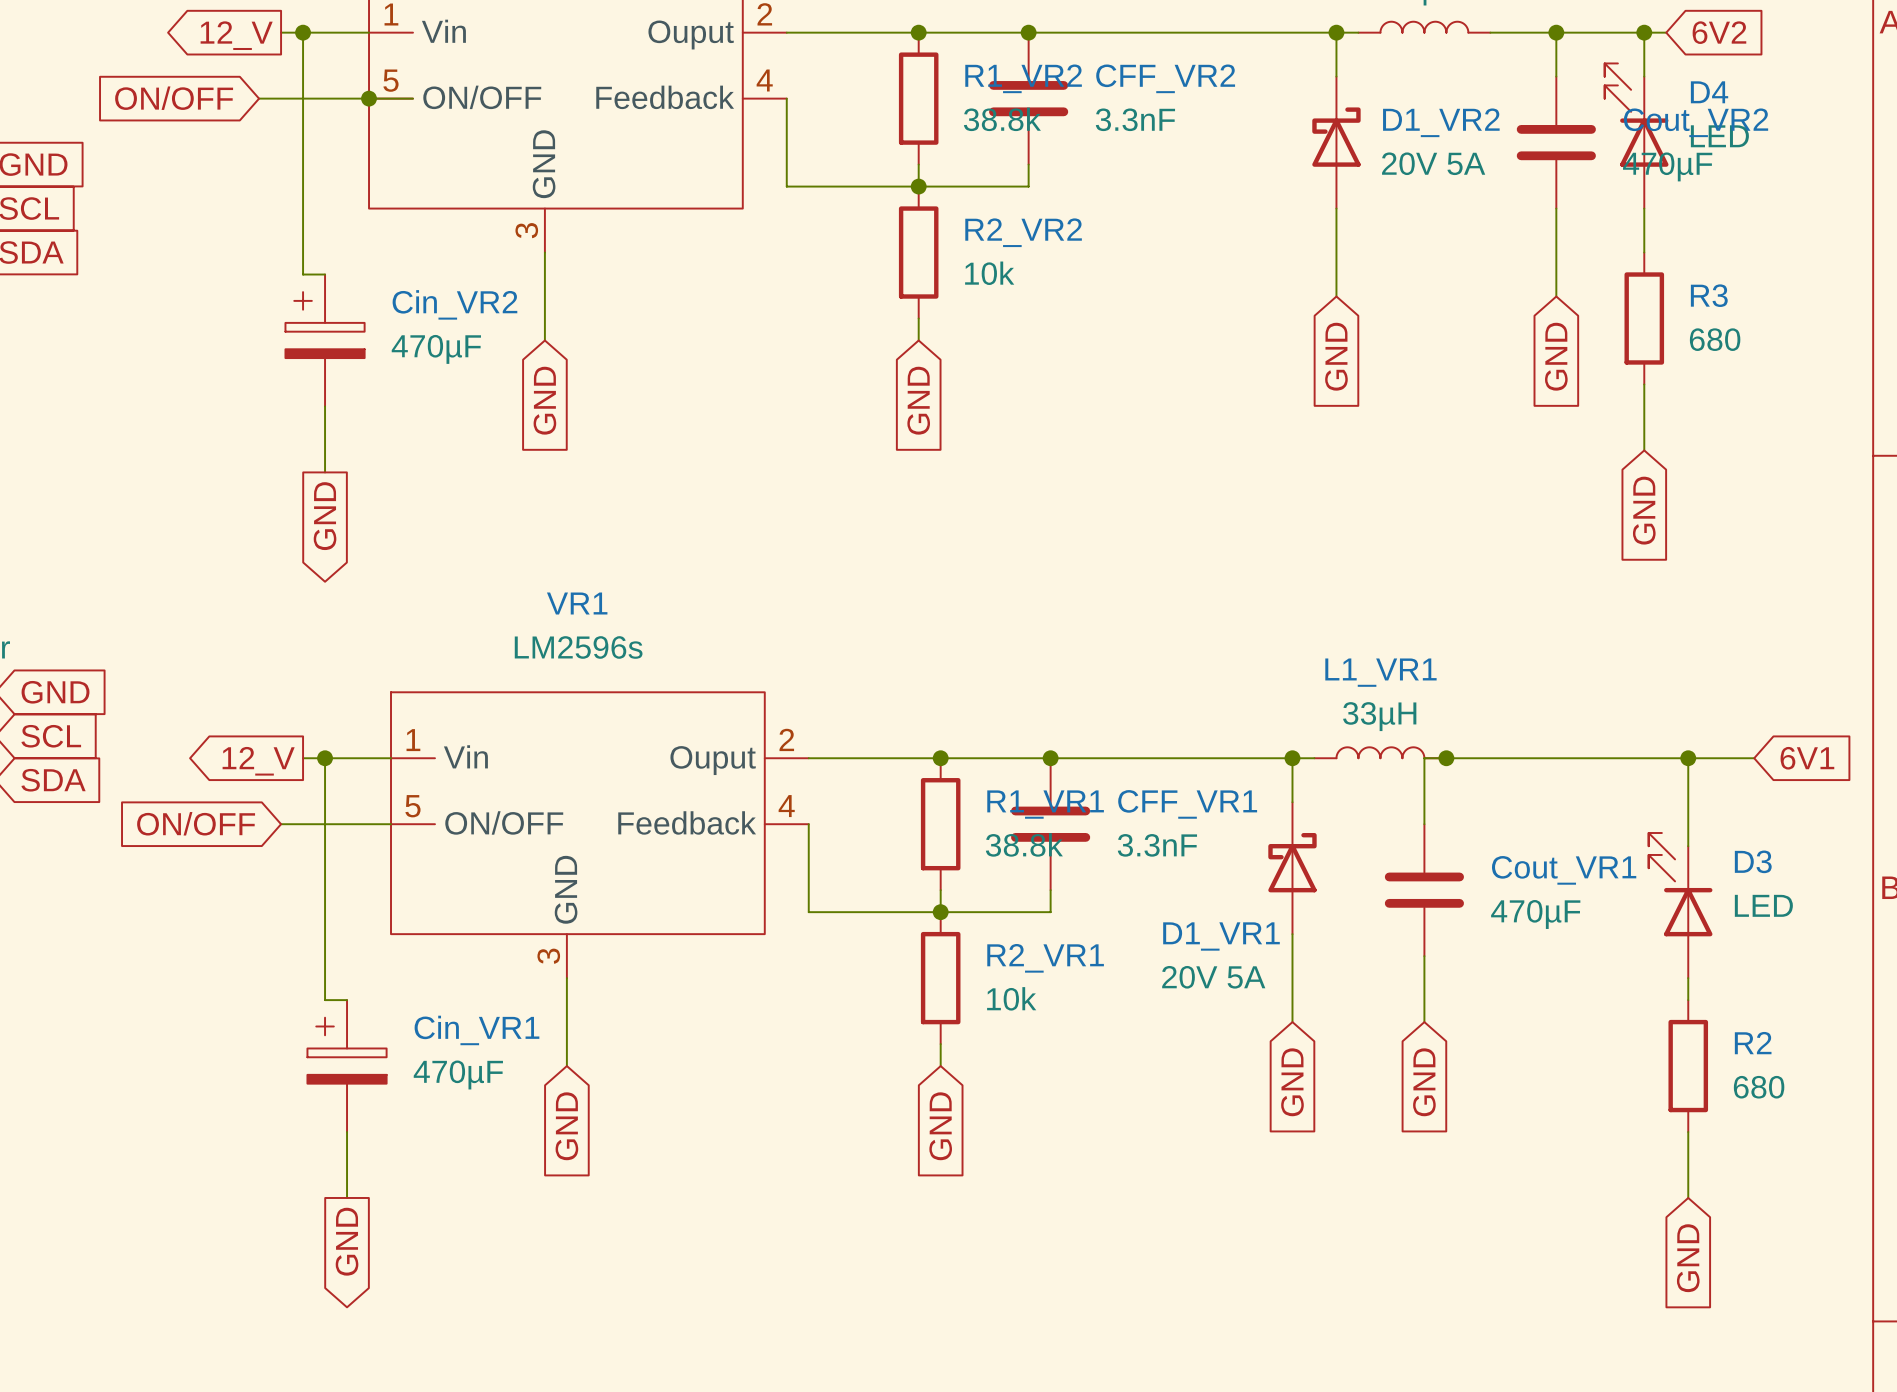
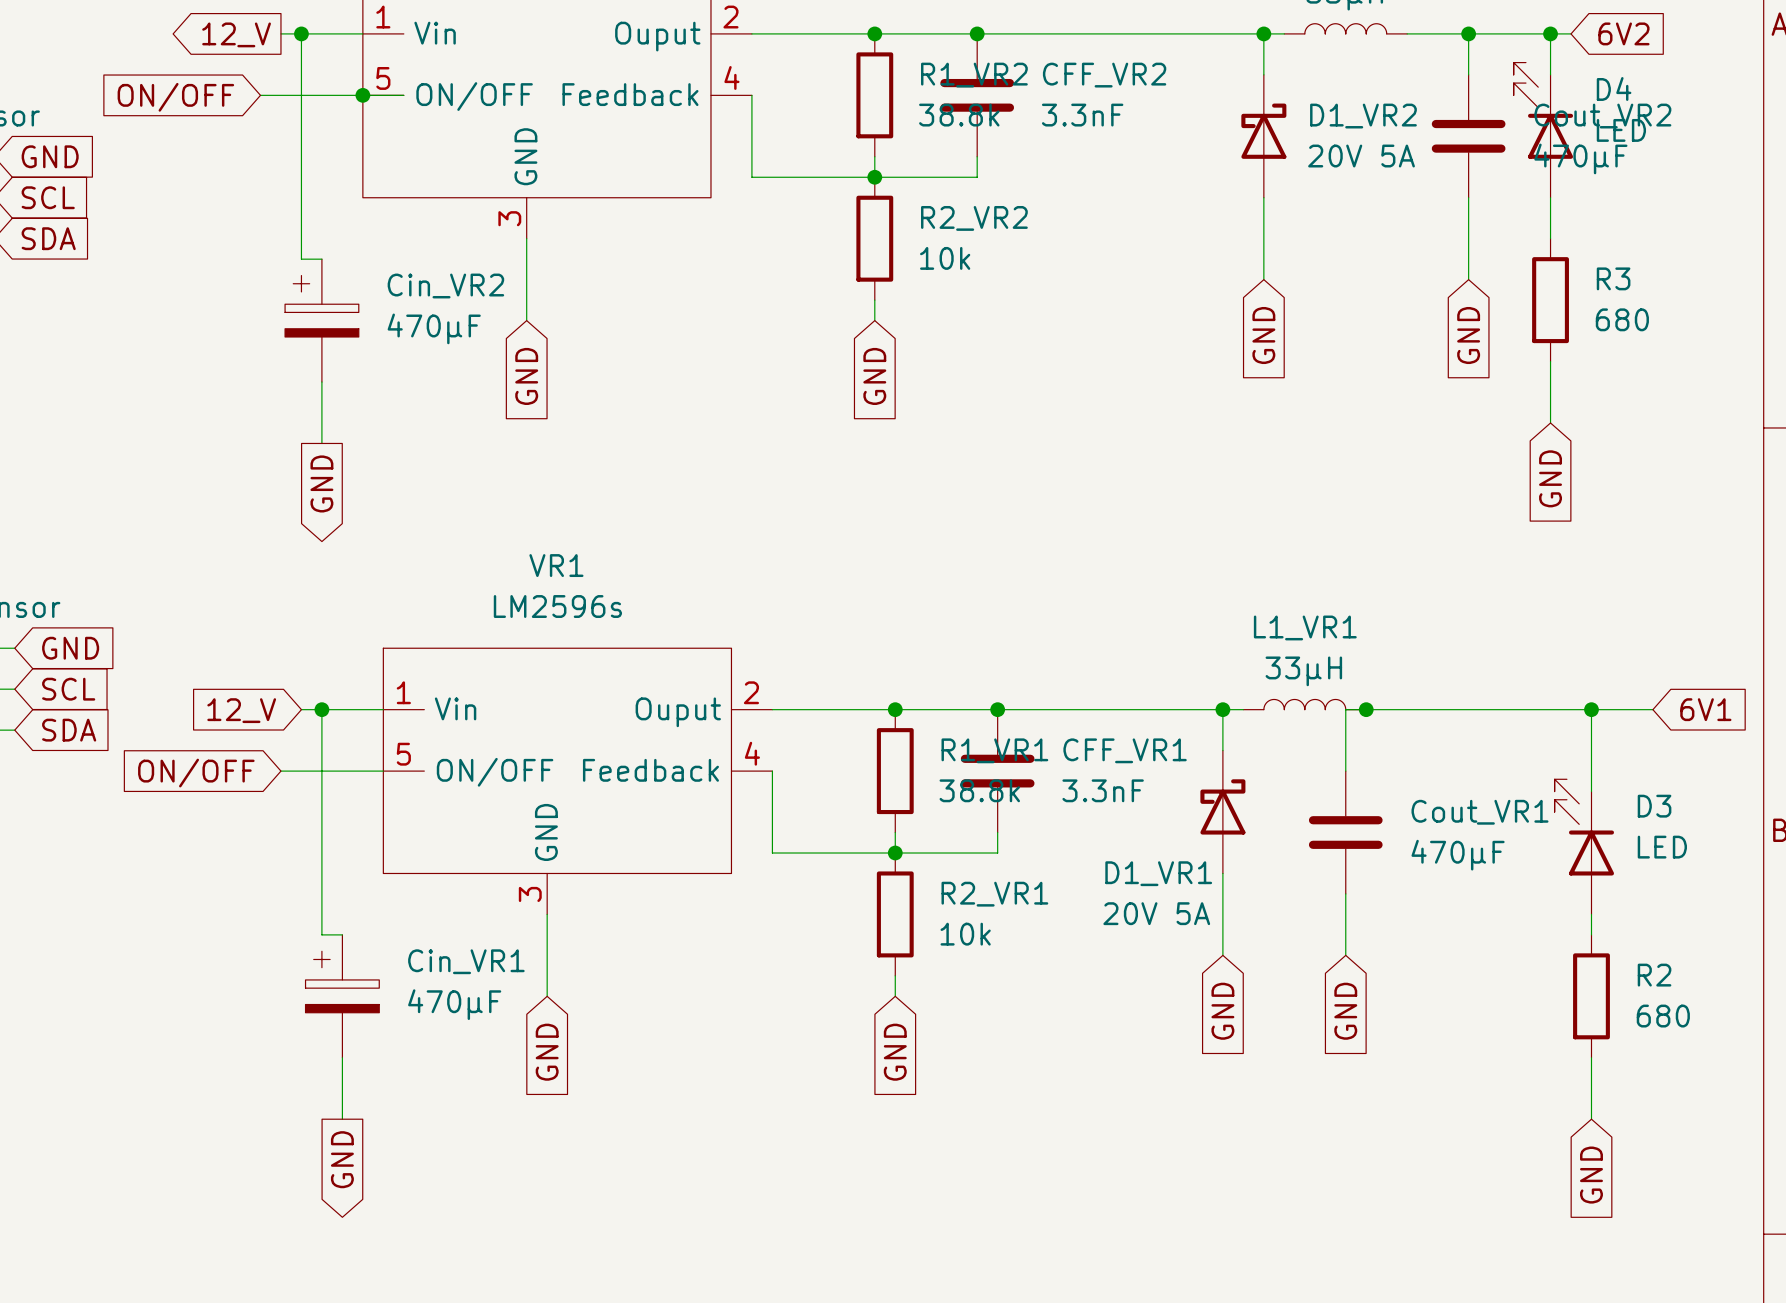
global label shape: output (258, 761) -> input (241, 710)

